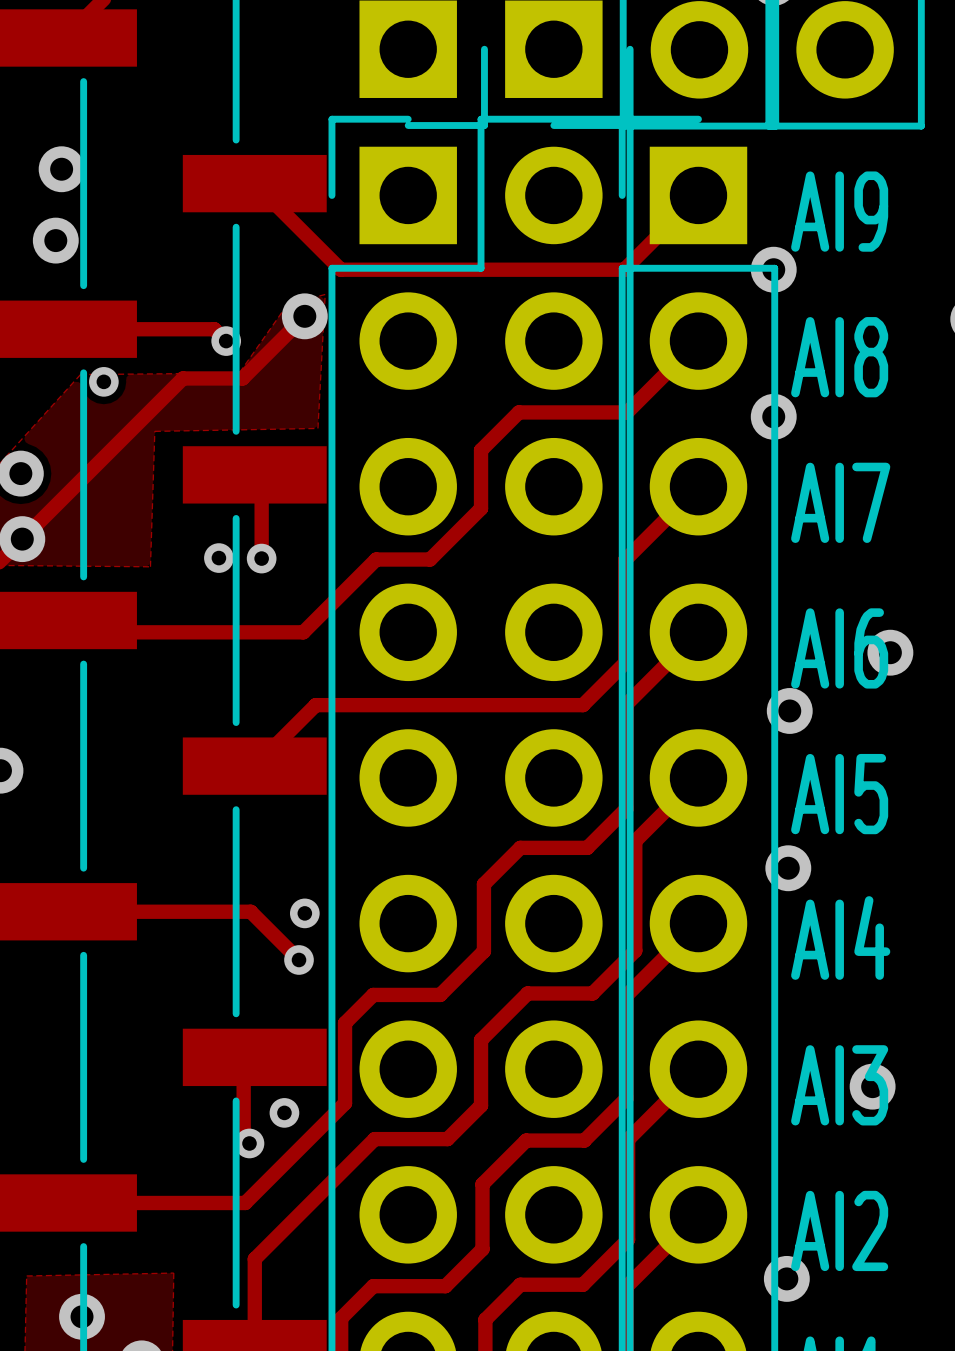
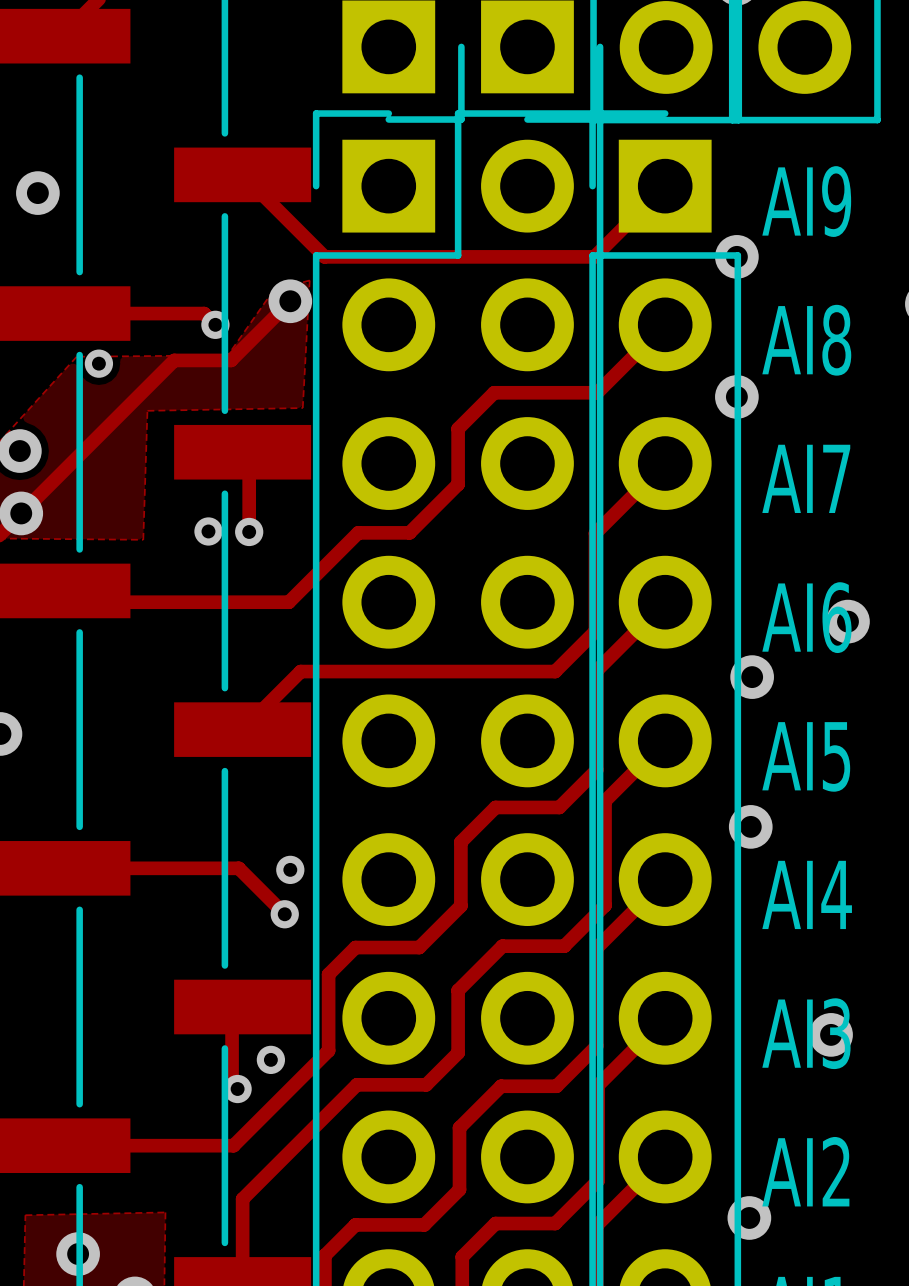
via: (61, 169) -> none
via: none -> (37, 193)
via: (55, 240) -> none

